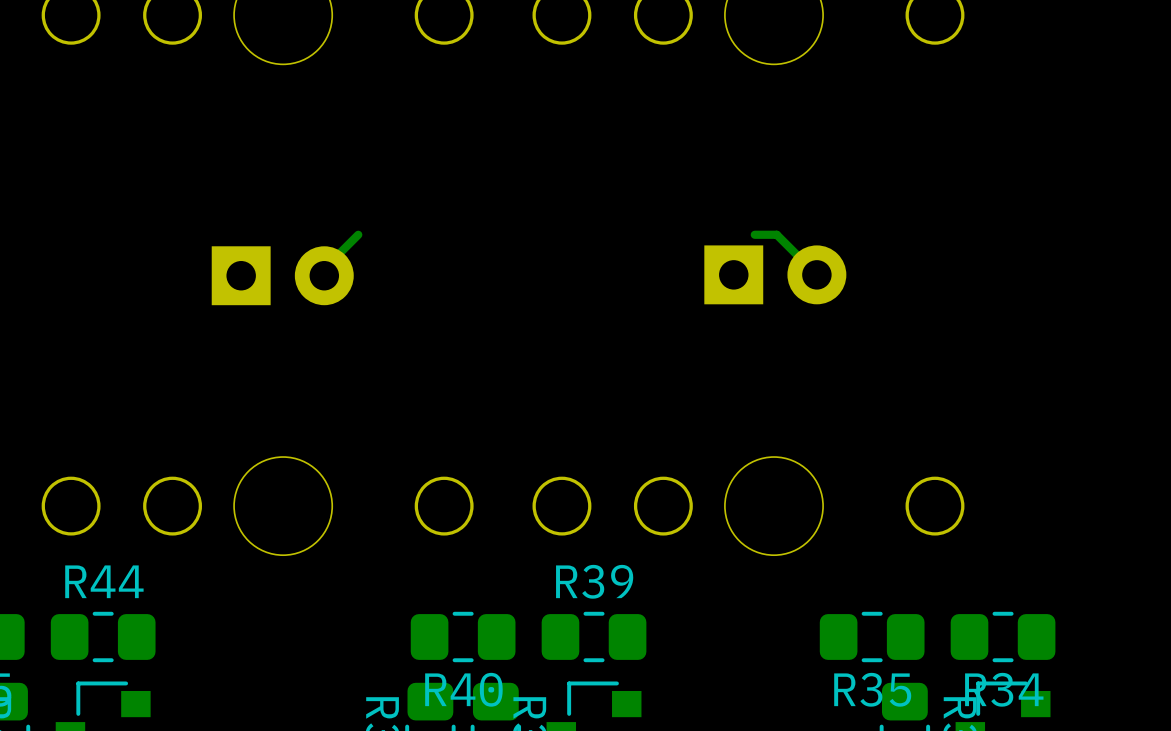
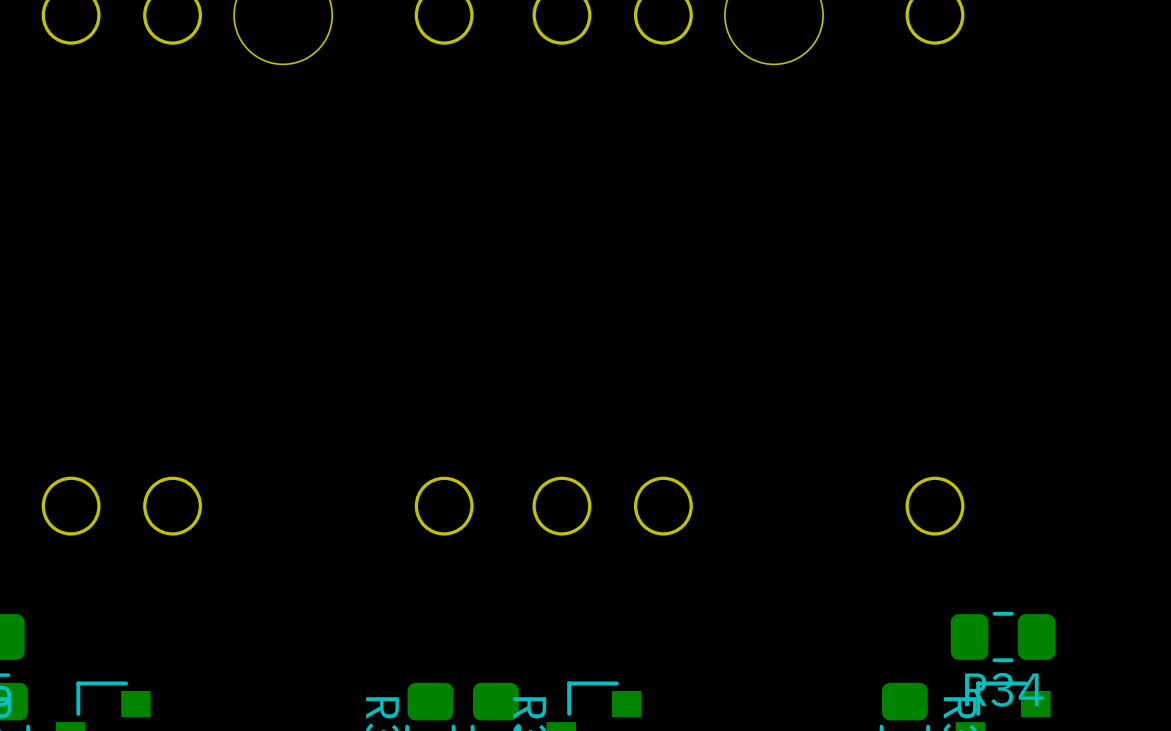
bottom track: (358, 234) (318, 274) -> none
bottom track: (754, 234) (776, 234) (816, 274) -> none
part: (775, 274) -> none
part: (282, 275) -> none
round board edge: [233, 456, 334, 557] -> none
round board edge: [724, 456, 824, 557] -> none
R44: (103, 636) -> none
R40: (463, 636) -> none
R39: (594, 636) -> none
R35: (872, 636) -> none

